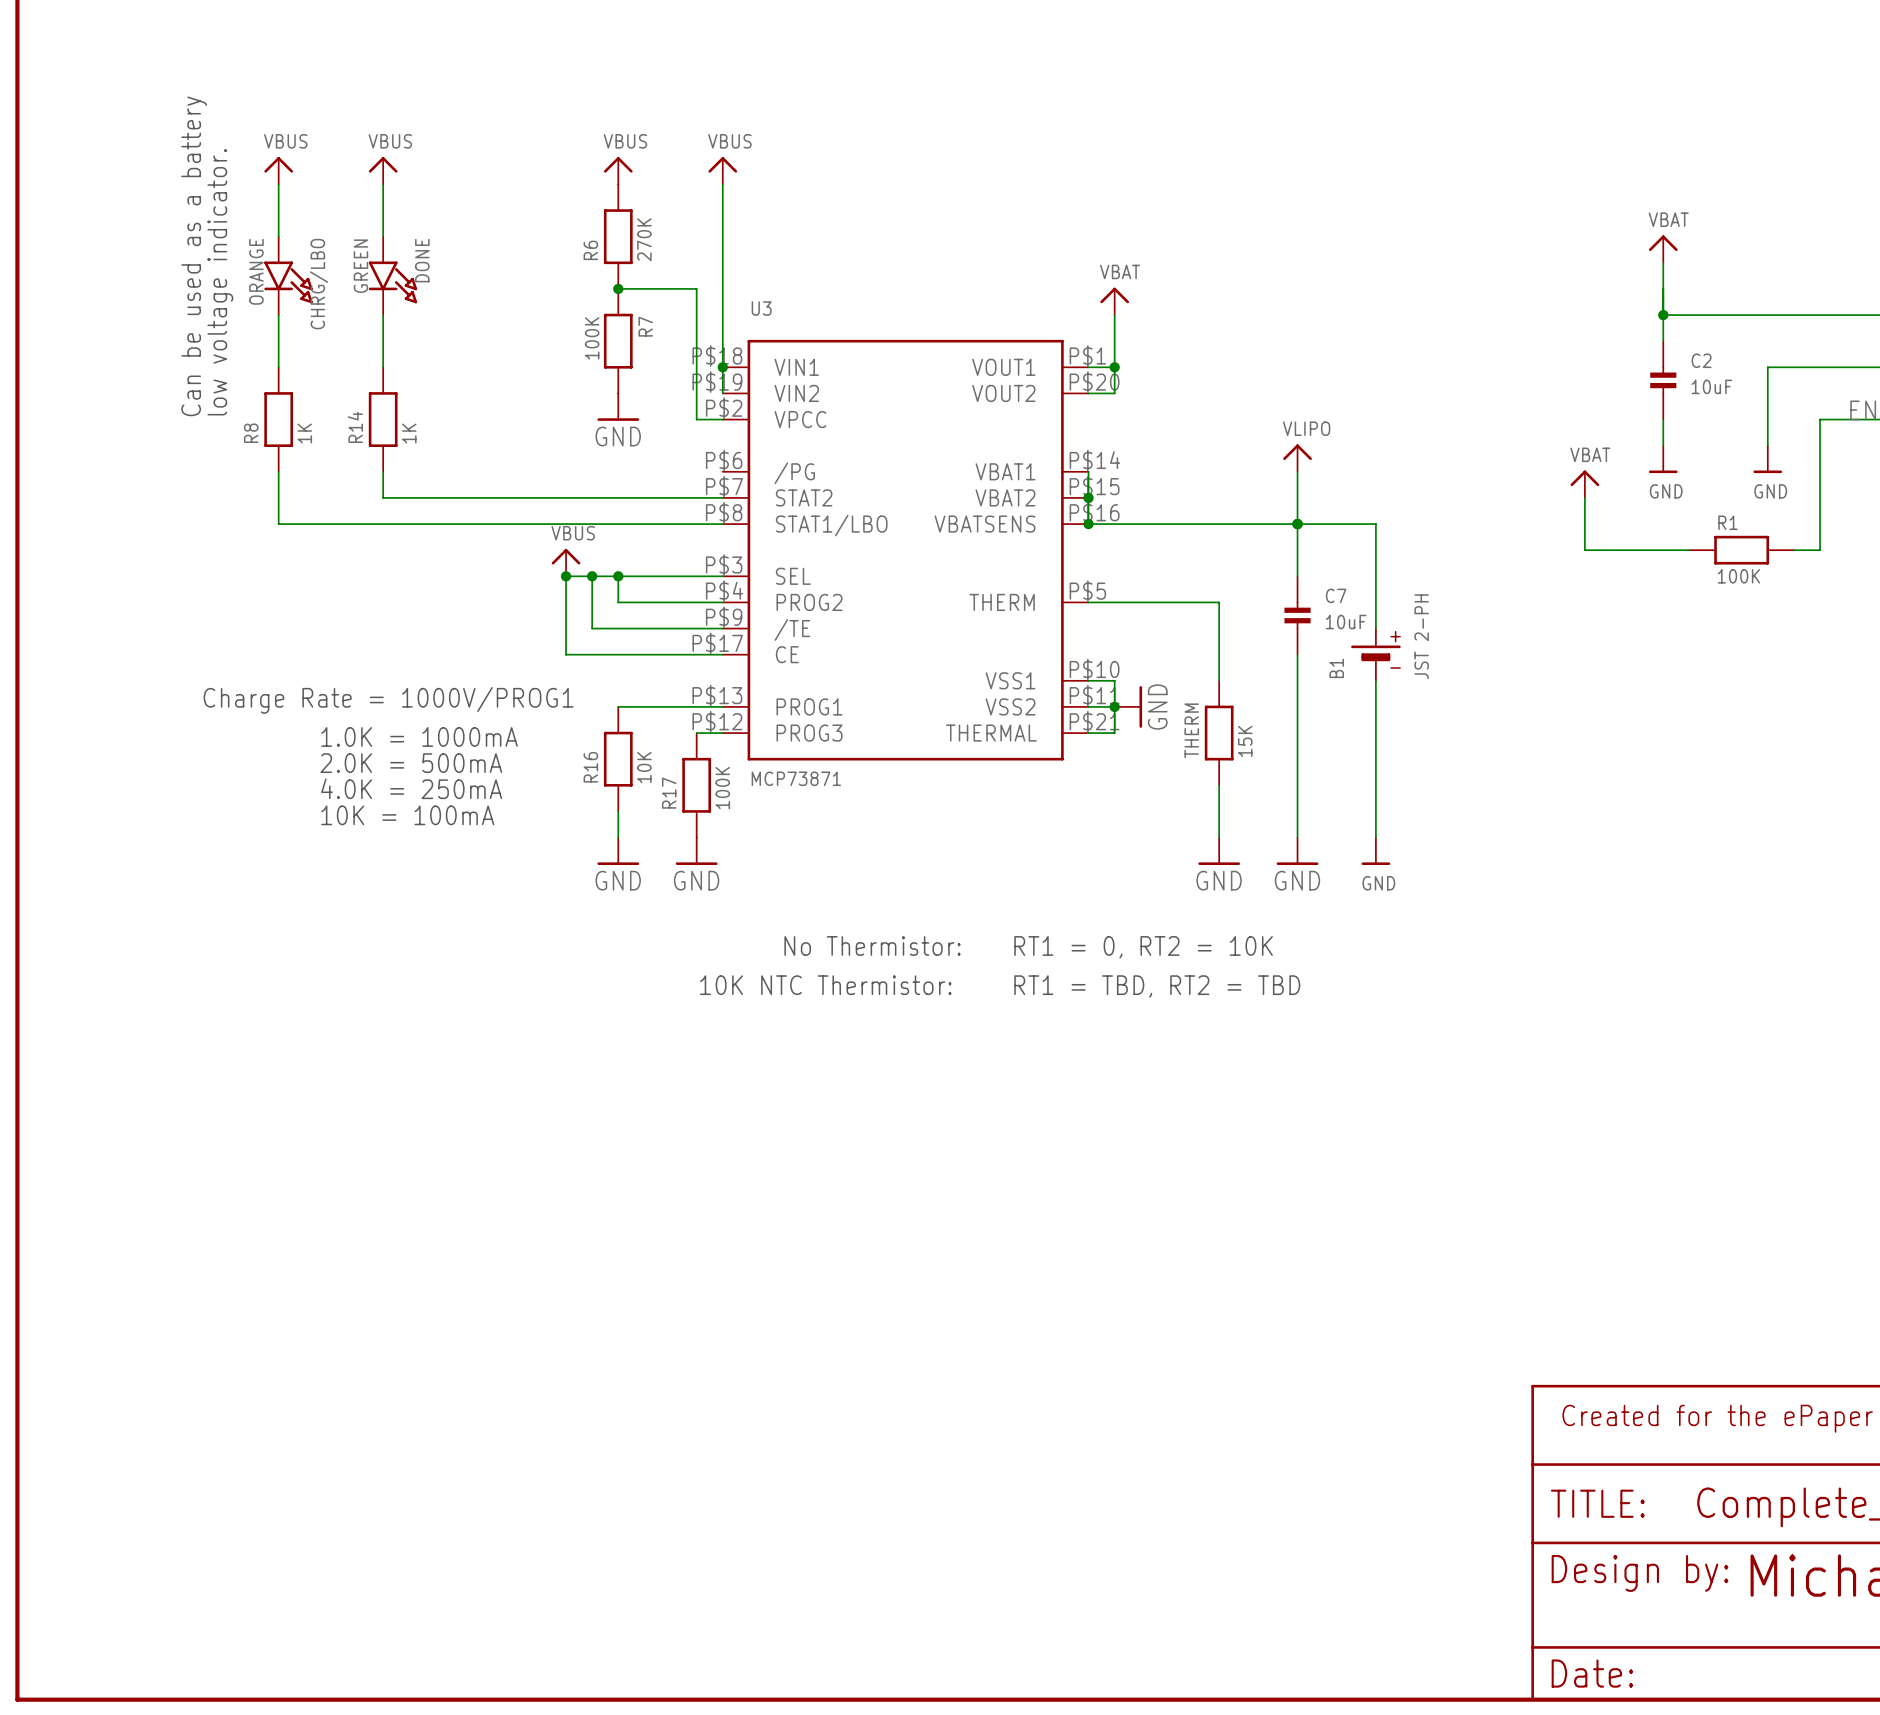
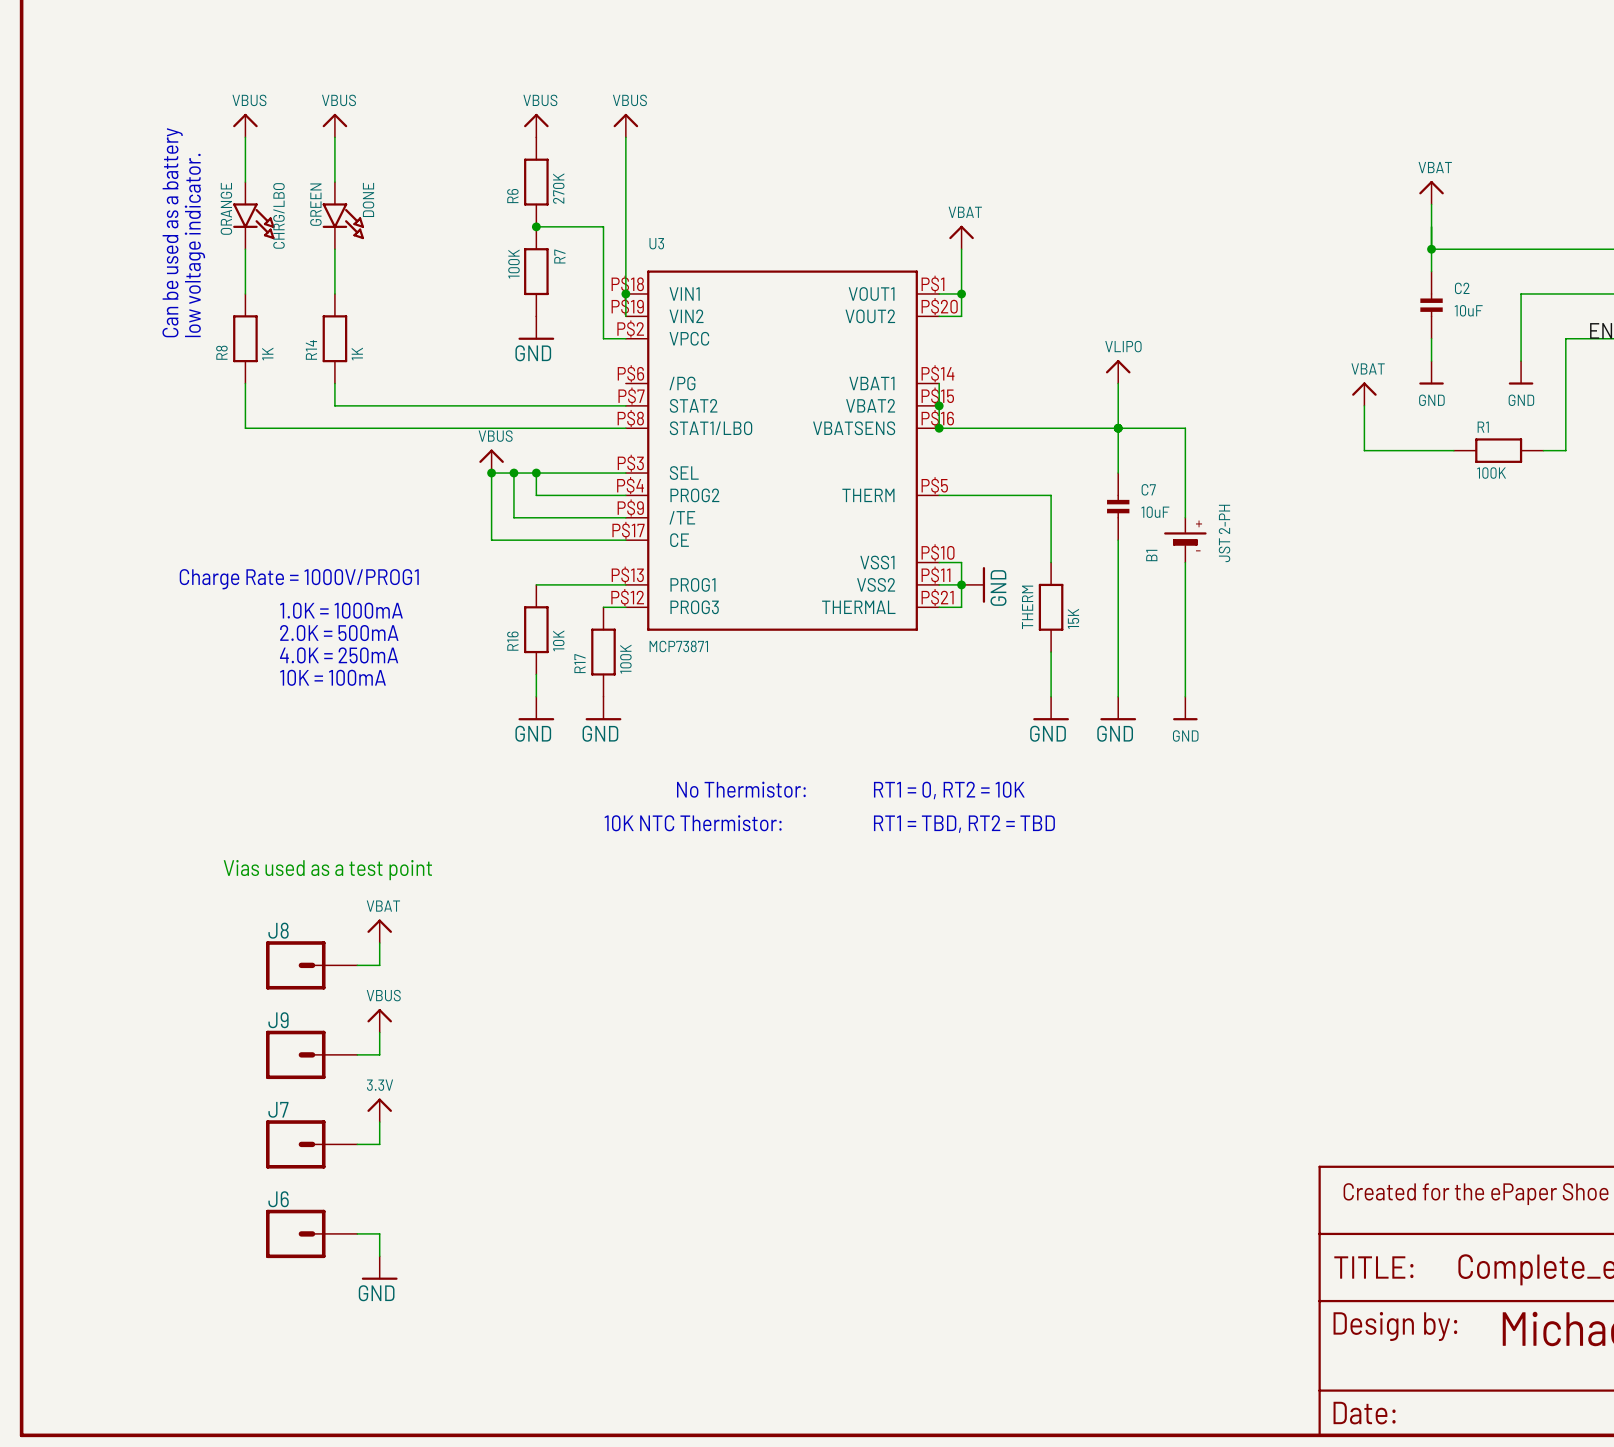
text: none -> Vias used as a test point (327, 870)
power symbol: none -> VBAT (379, 931)
wire: none -> (379, 942) (379, 965) (357, 965)
J8: none -> (311, 965)
power symbol: none -> VBUS (379, 1020)
wire: none -> (379, 1032) (379, 1054) (357, 1054)
J9: none -> (311, 1054)
power symbol: none -> 3.3V (379, 1110)
wire: none -> (379, 1122) (379, 1144) (357, 1144)
J7: none -> (311, 1144)
J6: none -> (311, 1233)
wire: none -> (357, 1233) (379, 1233) (379, 1256)
power symbol: none -> GND (379, 1268)

